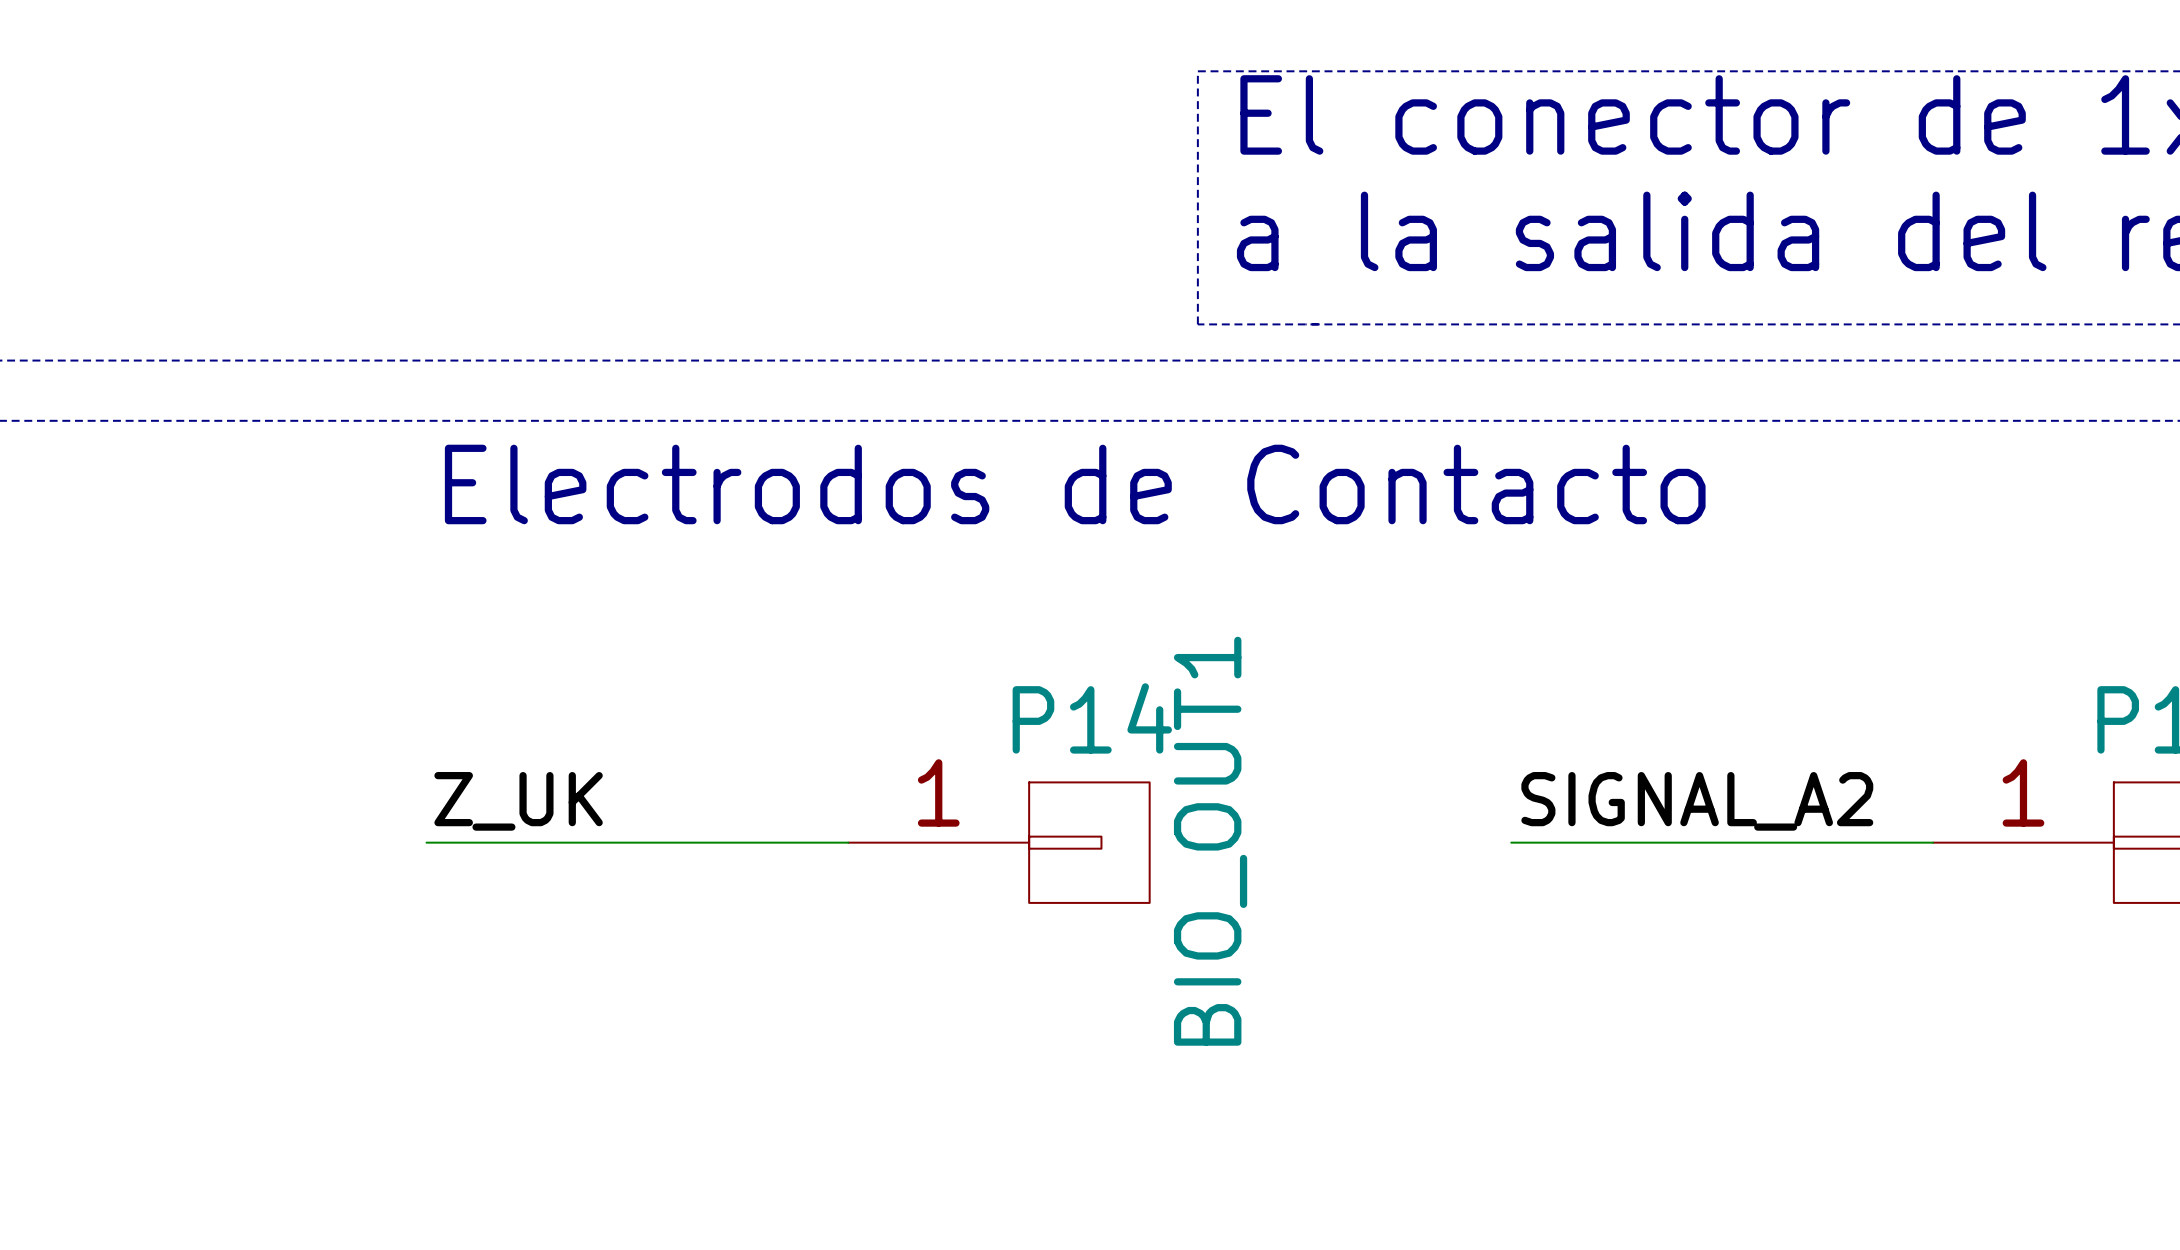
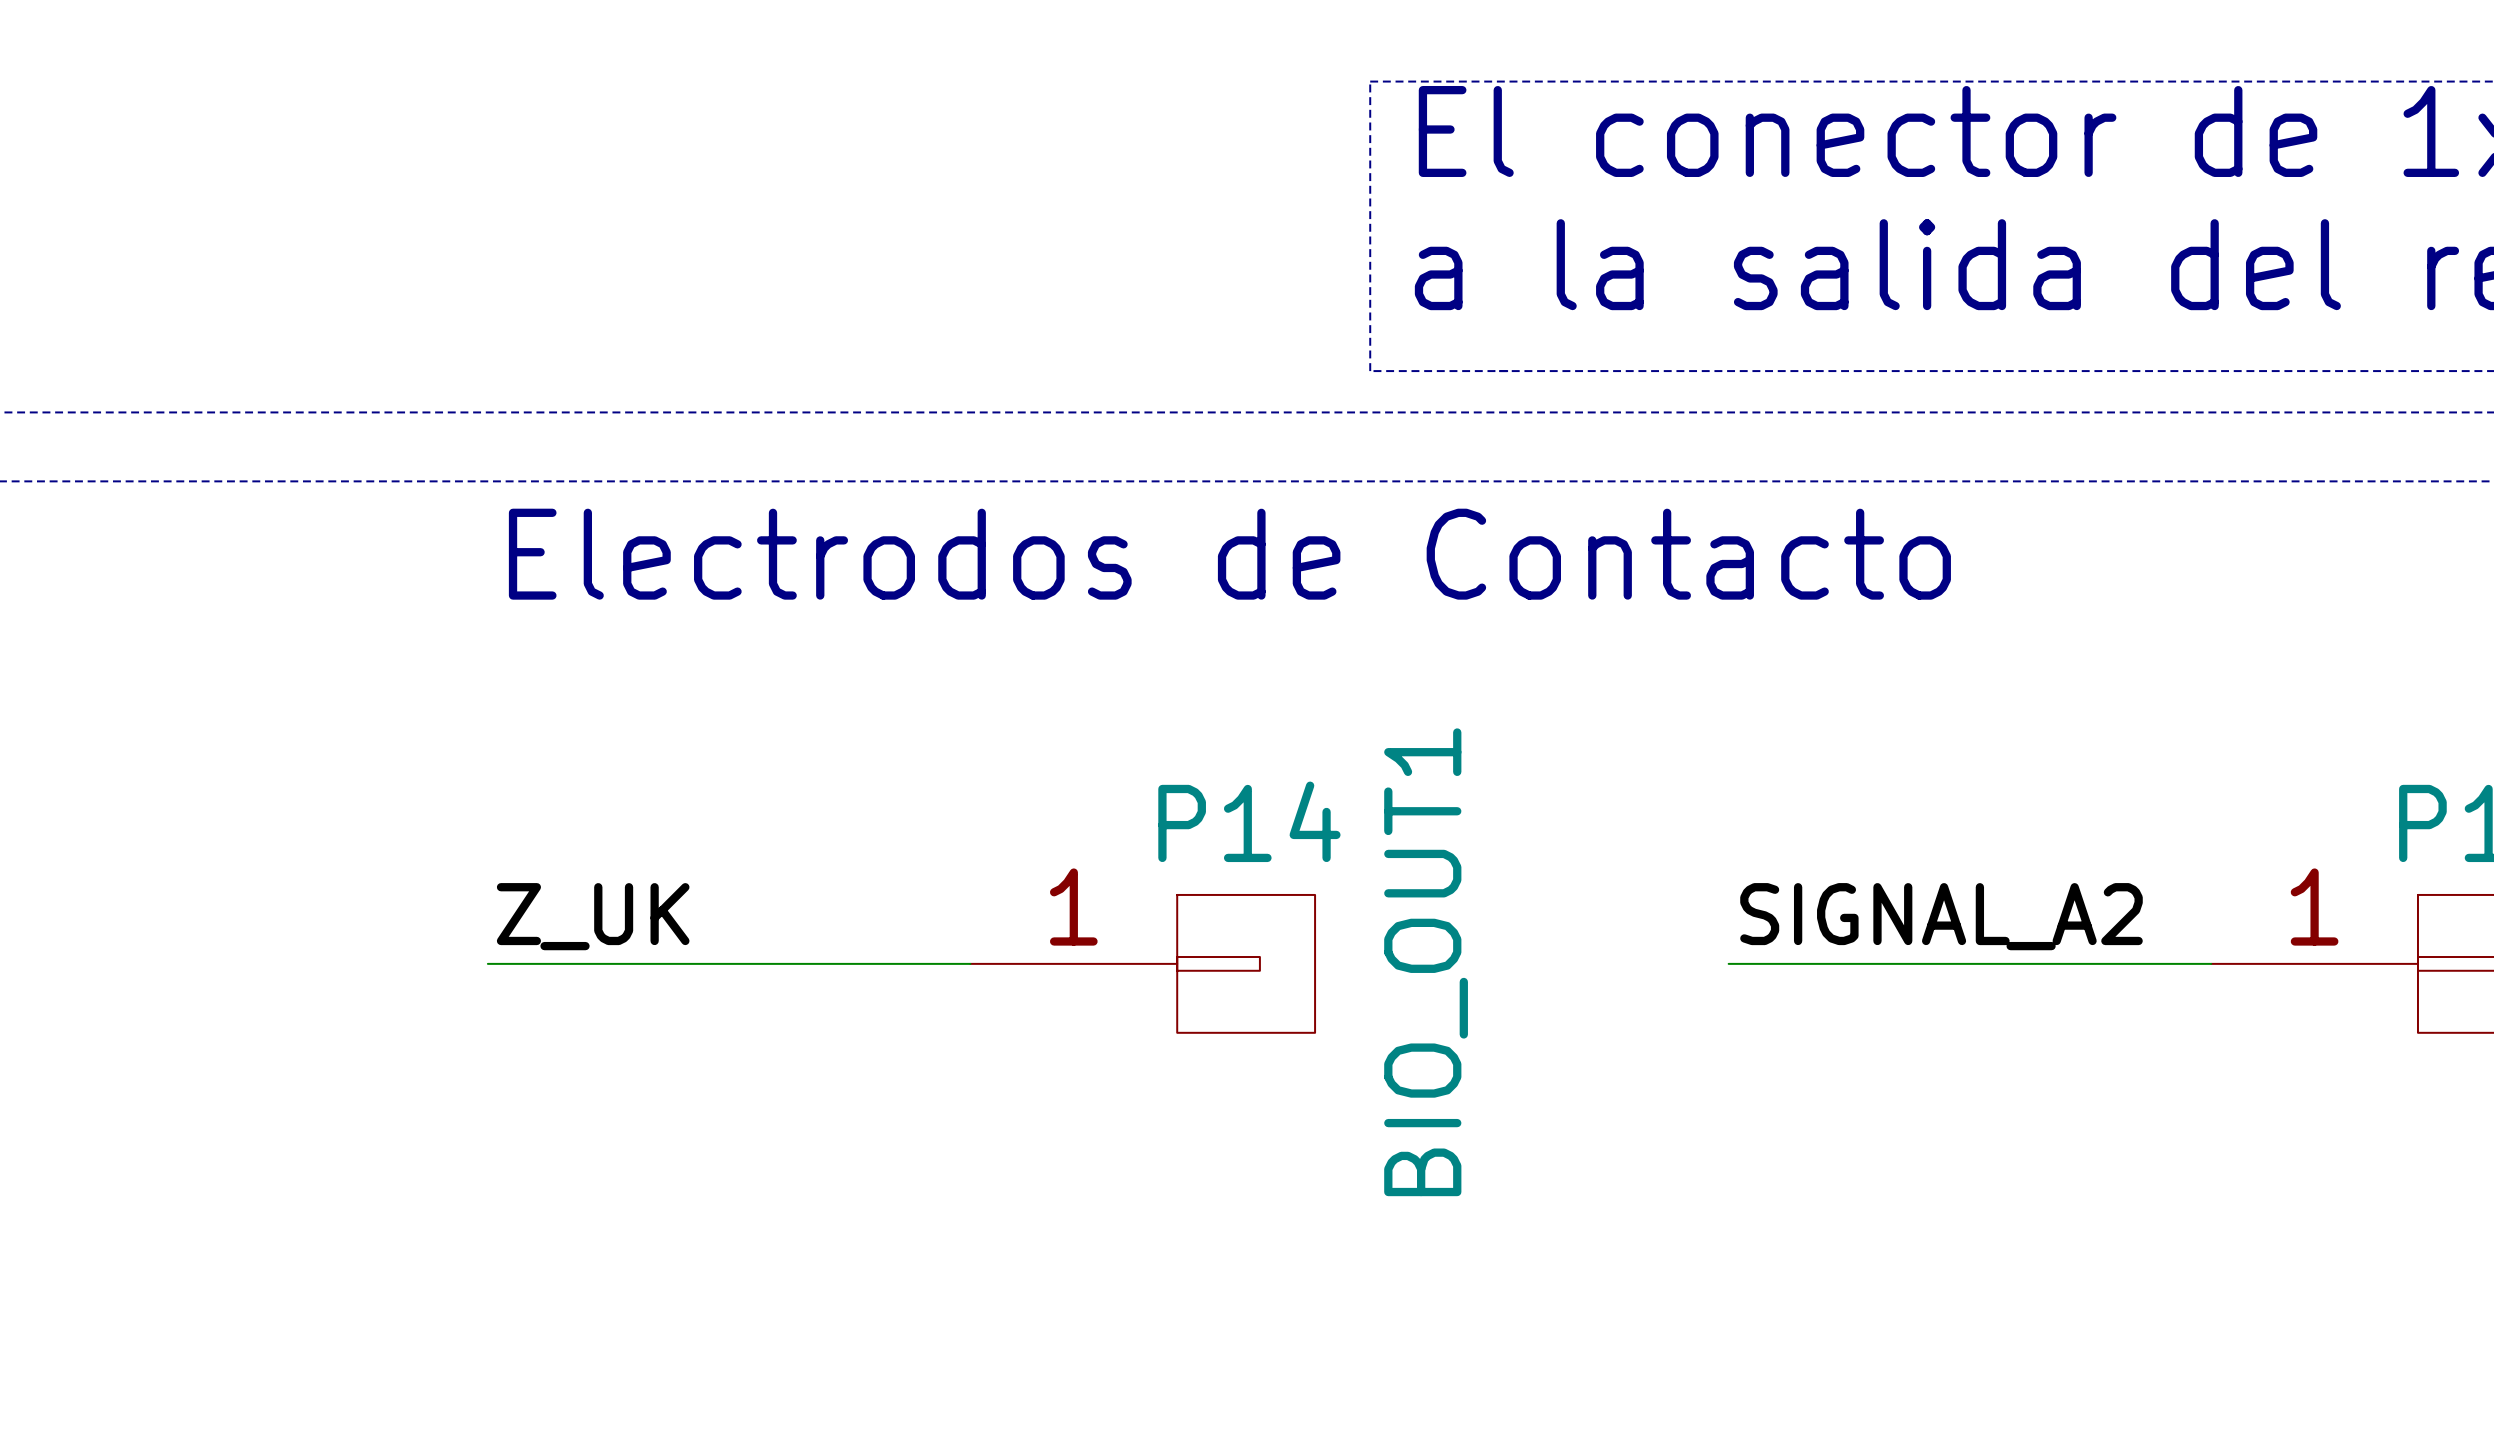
P14 value position: BIO_OUT1 (1210, 841) -> BIO_OUT1 (1426, 962)

